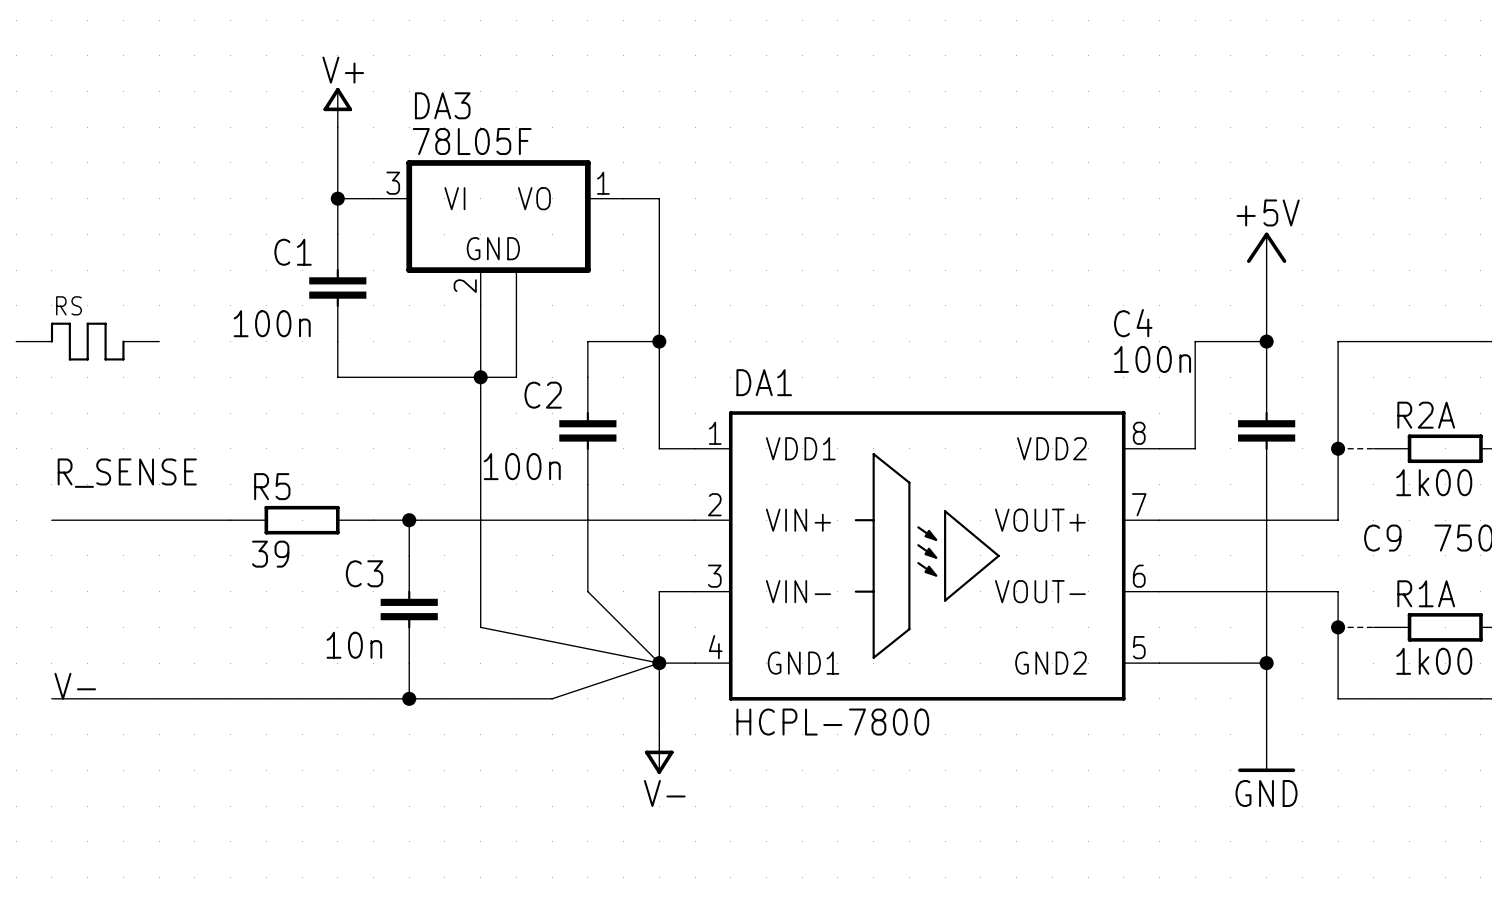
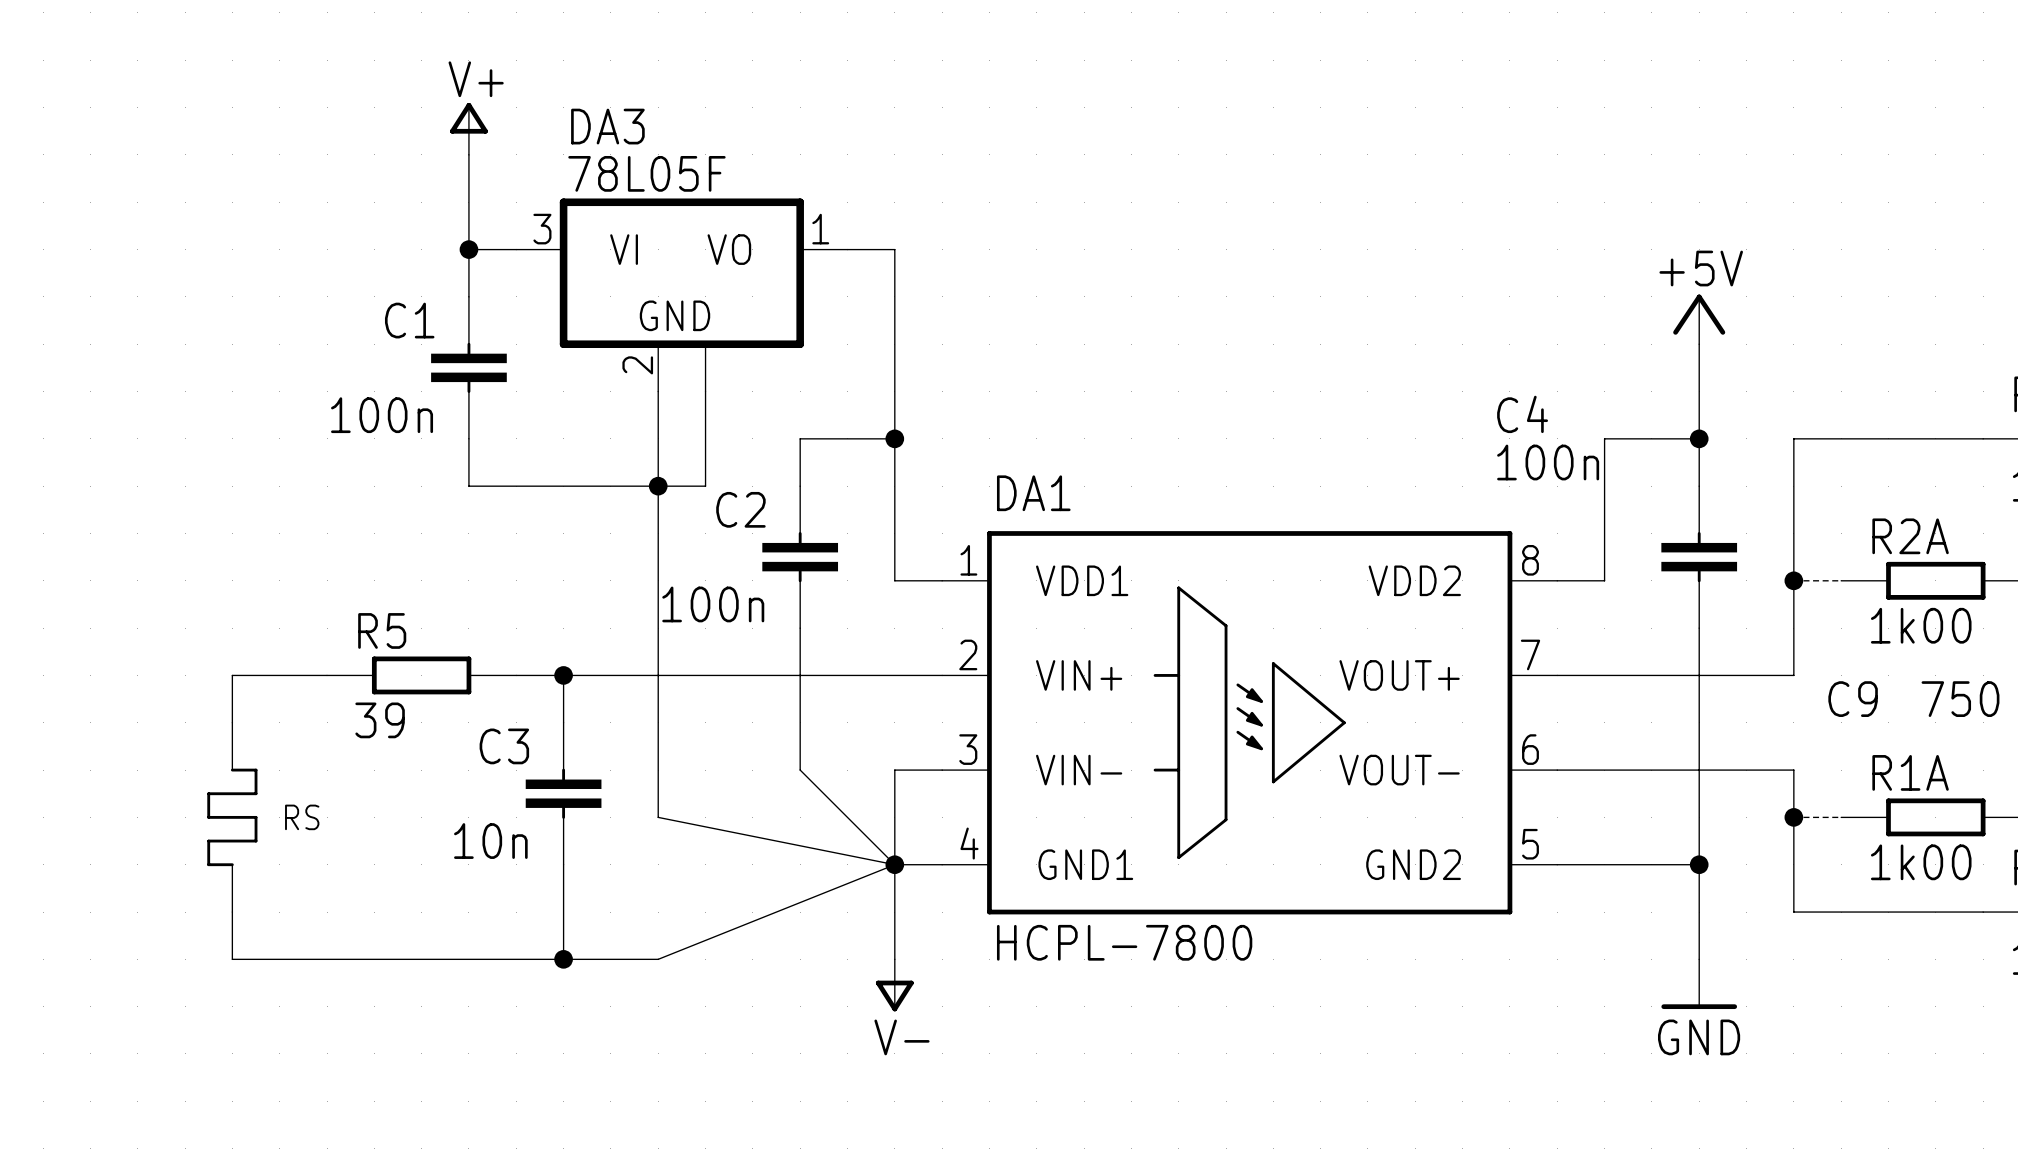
RS rotation: 0° (87, 341) -> 90° clockwise (232, 817)
RS position: (87, 341) -> (232, 817)
label: R_SENSE (127, 473) -> none
wire: (51, 520) (159, 520) -> (232, 722) (232, 675)
wire: (659, 663) (552, 698) (51, 698) -> (894, 864) (658, 959) (232, 959) (232, 912)
label: V- (75, 686) -> none
wire: none -> (563, 912) (563, 959)
junction position: (409, 698) -> (563, 959)

